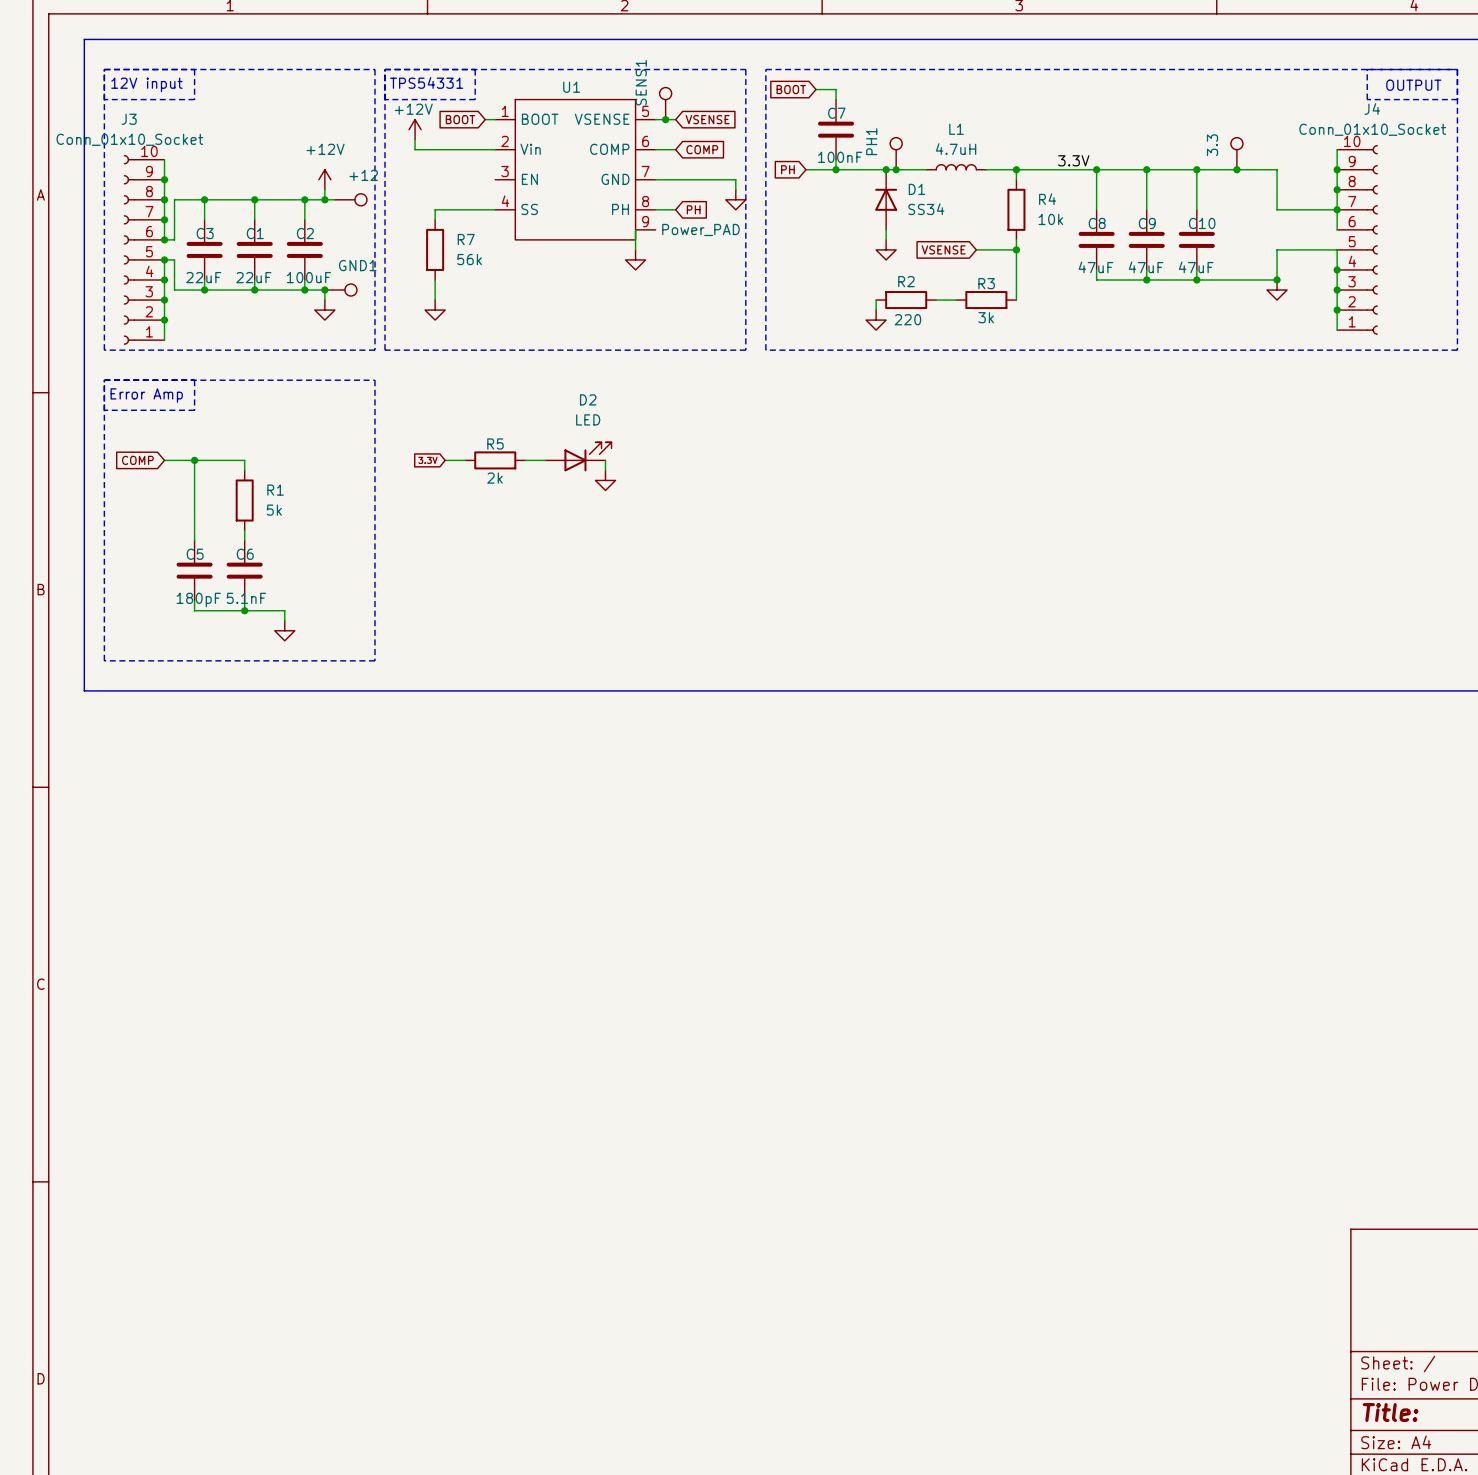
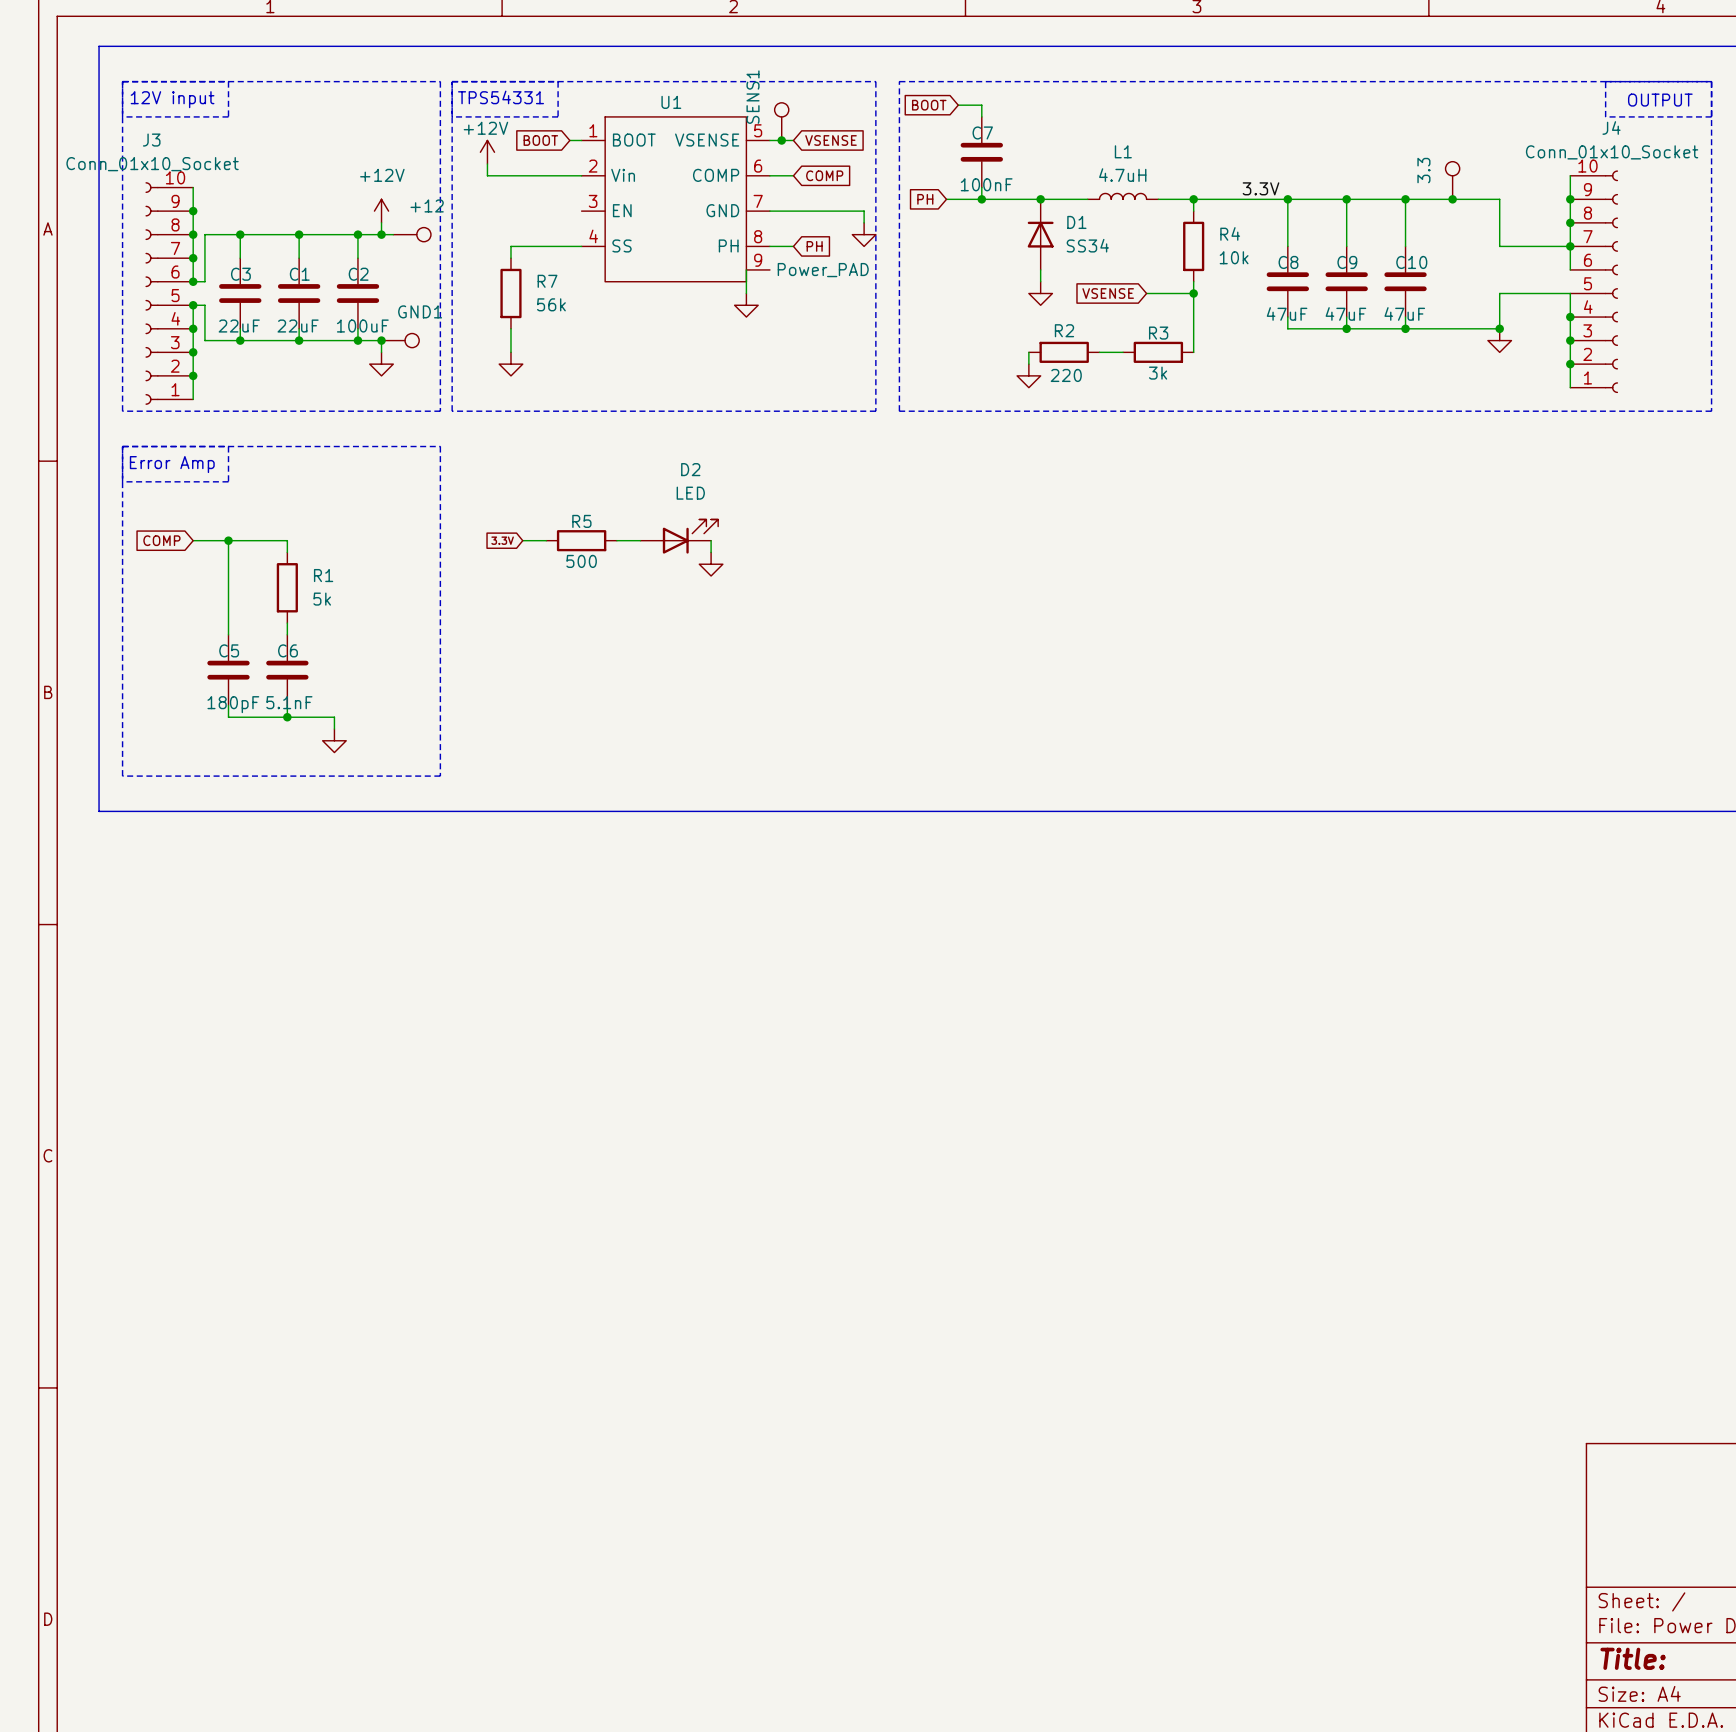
PH1: (896, 153) -> none
junction: (896, 169) -> none
R5 value: 2k (495, 478) -> 500 (581, 561)

